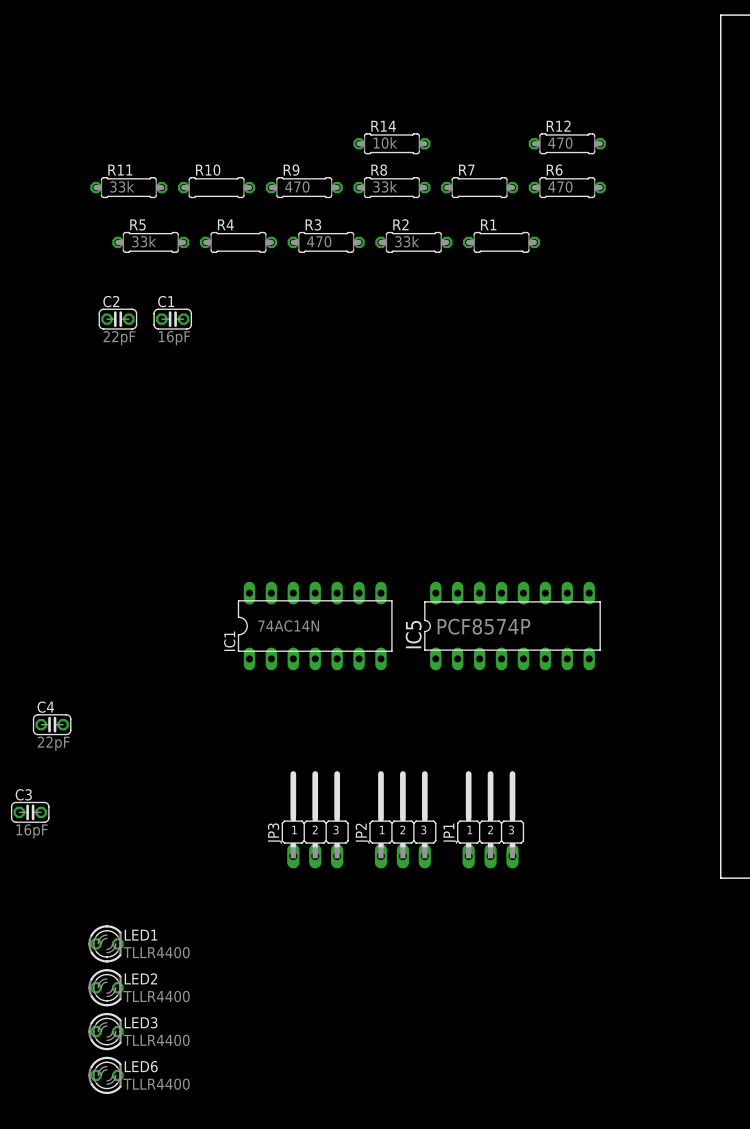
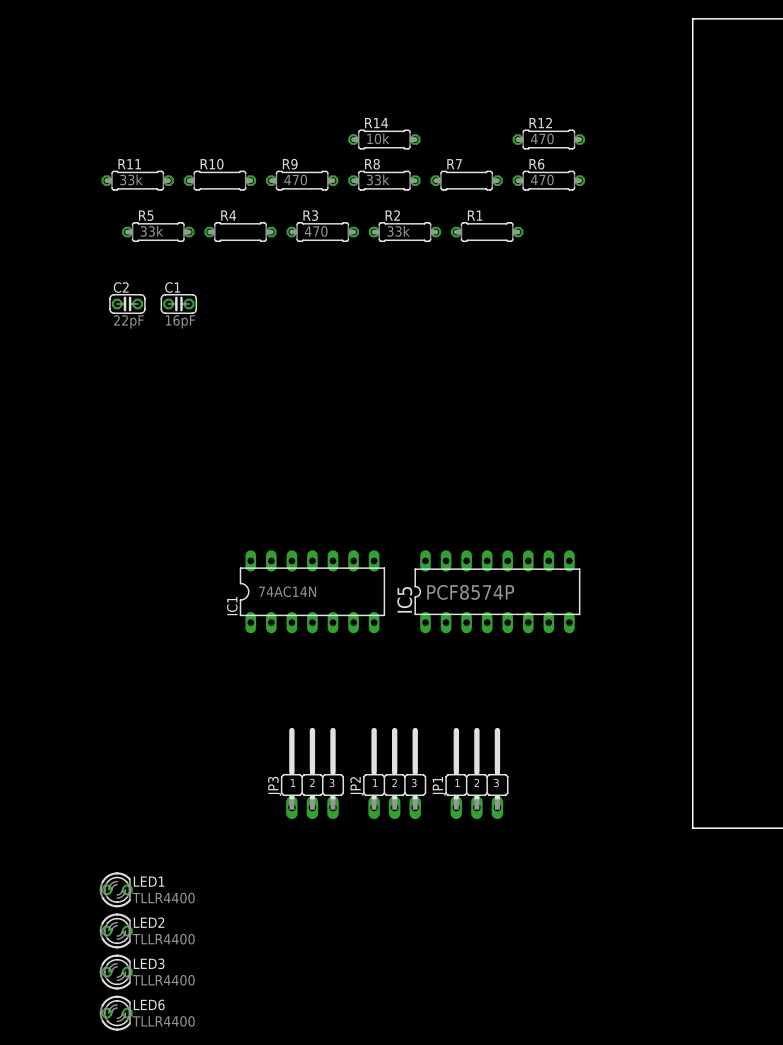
C4: 22pF (52, 724) -> none
C3: 16pF (30, 812) -> none

